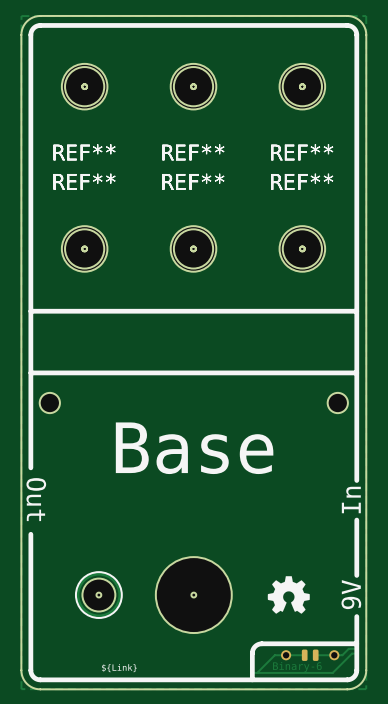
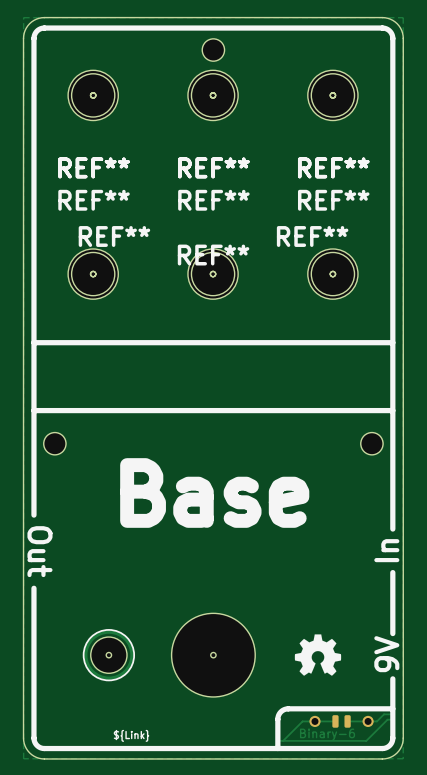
part: none -> (213, 50)
REF** name position: REF** (84, 181) -> REF** (114, 236)
REF** name position: REF** (193, 181) -> REF** (213, 255)
REF** name position: REF** (302, 181) -> REF** (312, 236)

